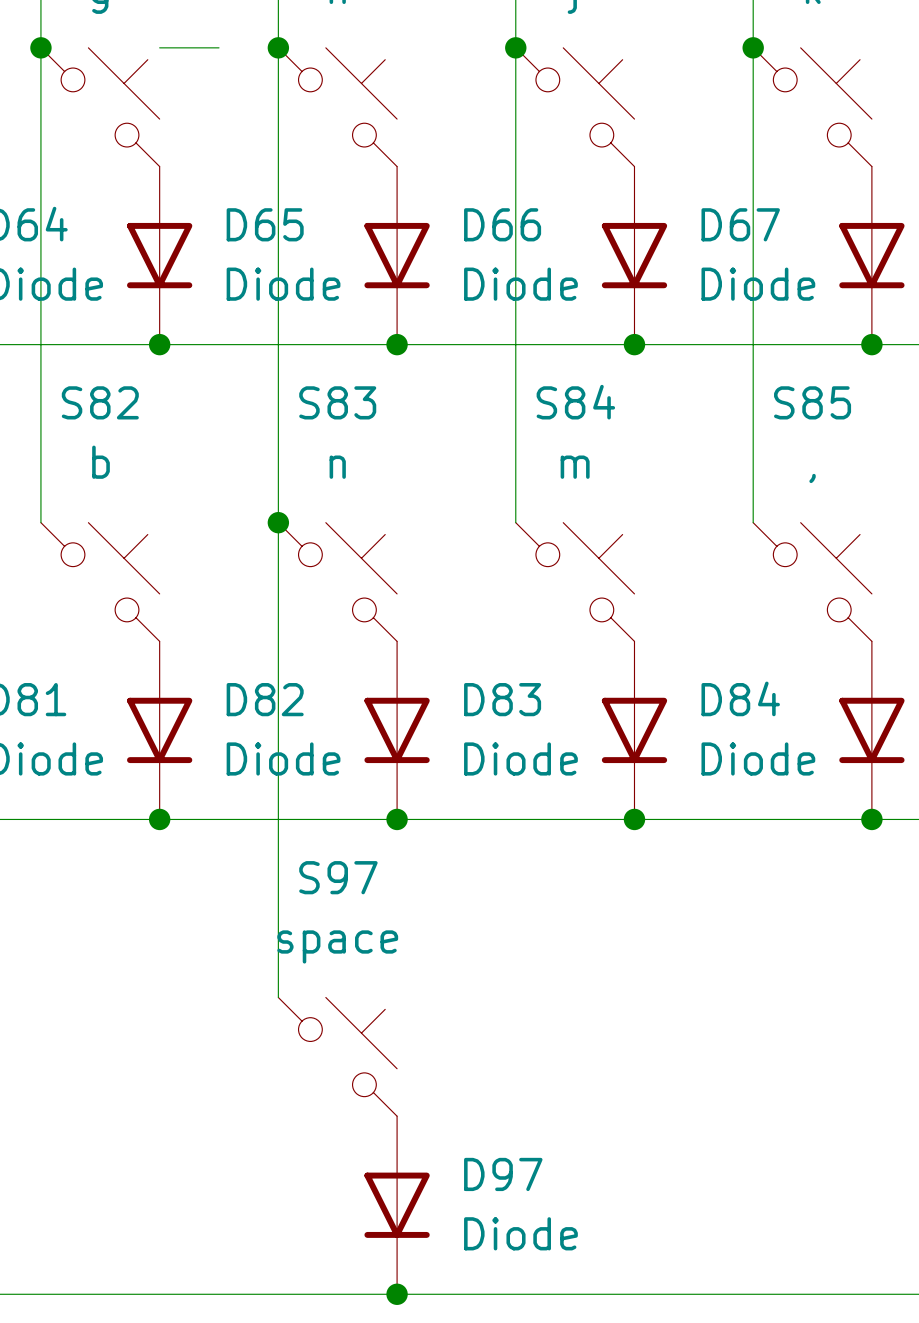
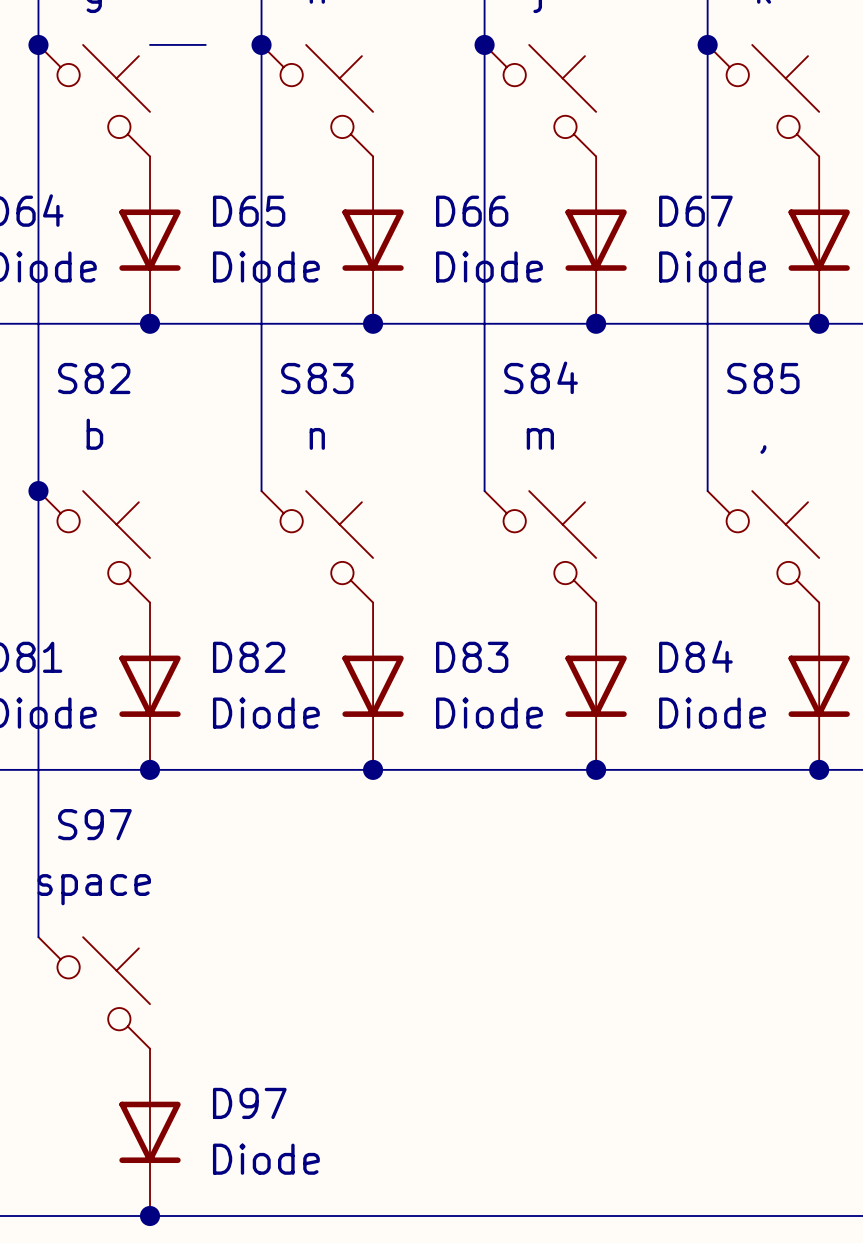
junction: none -> (38, 491)
wire: (278, 522) (278, 997) -> (38, 491) (38, 937)
junction: (278, 522) -> none
S97 position: (337, 1056) -> (94, 992)
D97 position: (397, 1205) -> (150, 1132)
junction: none -> (150, 1216)
junction: (397, 1294) -> none

